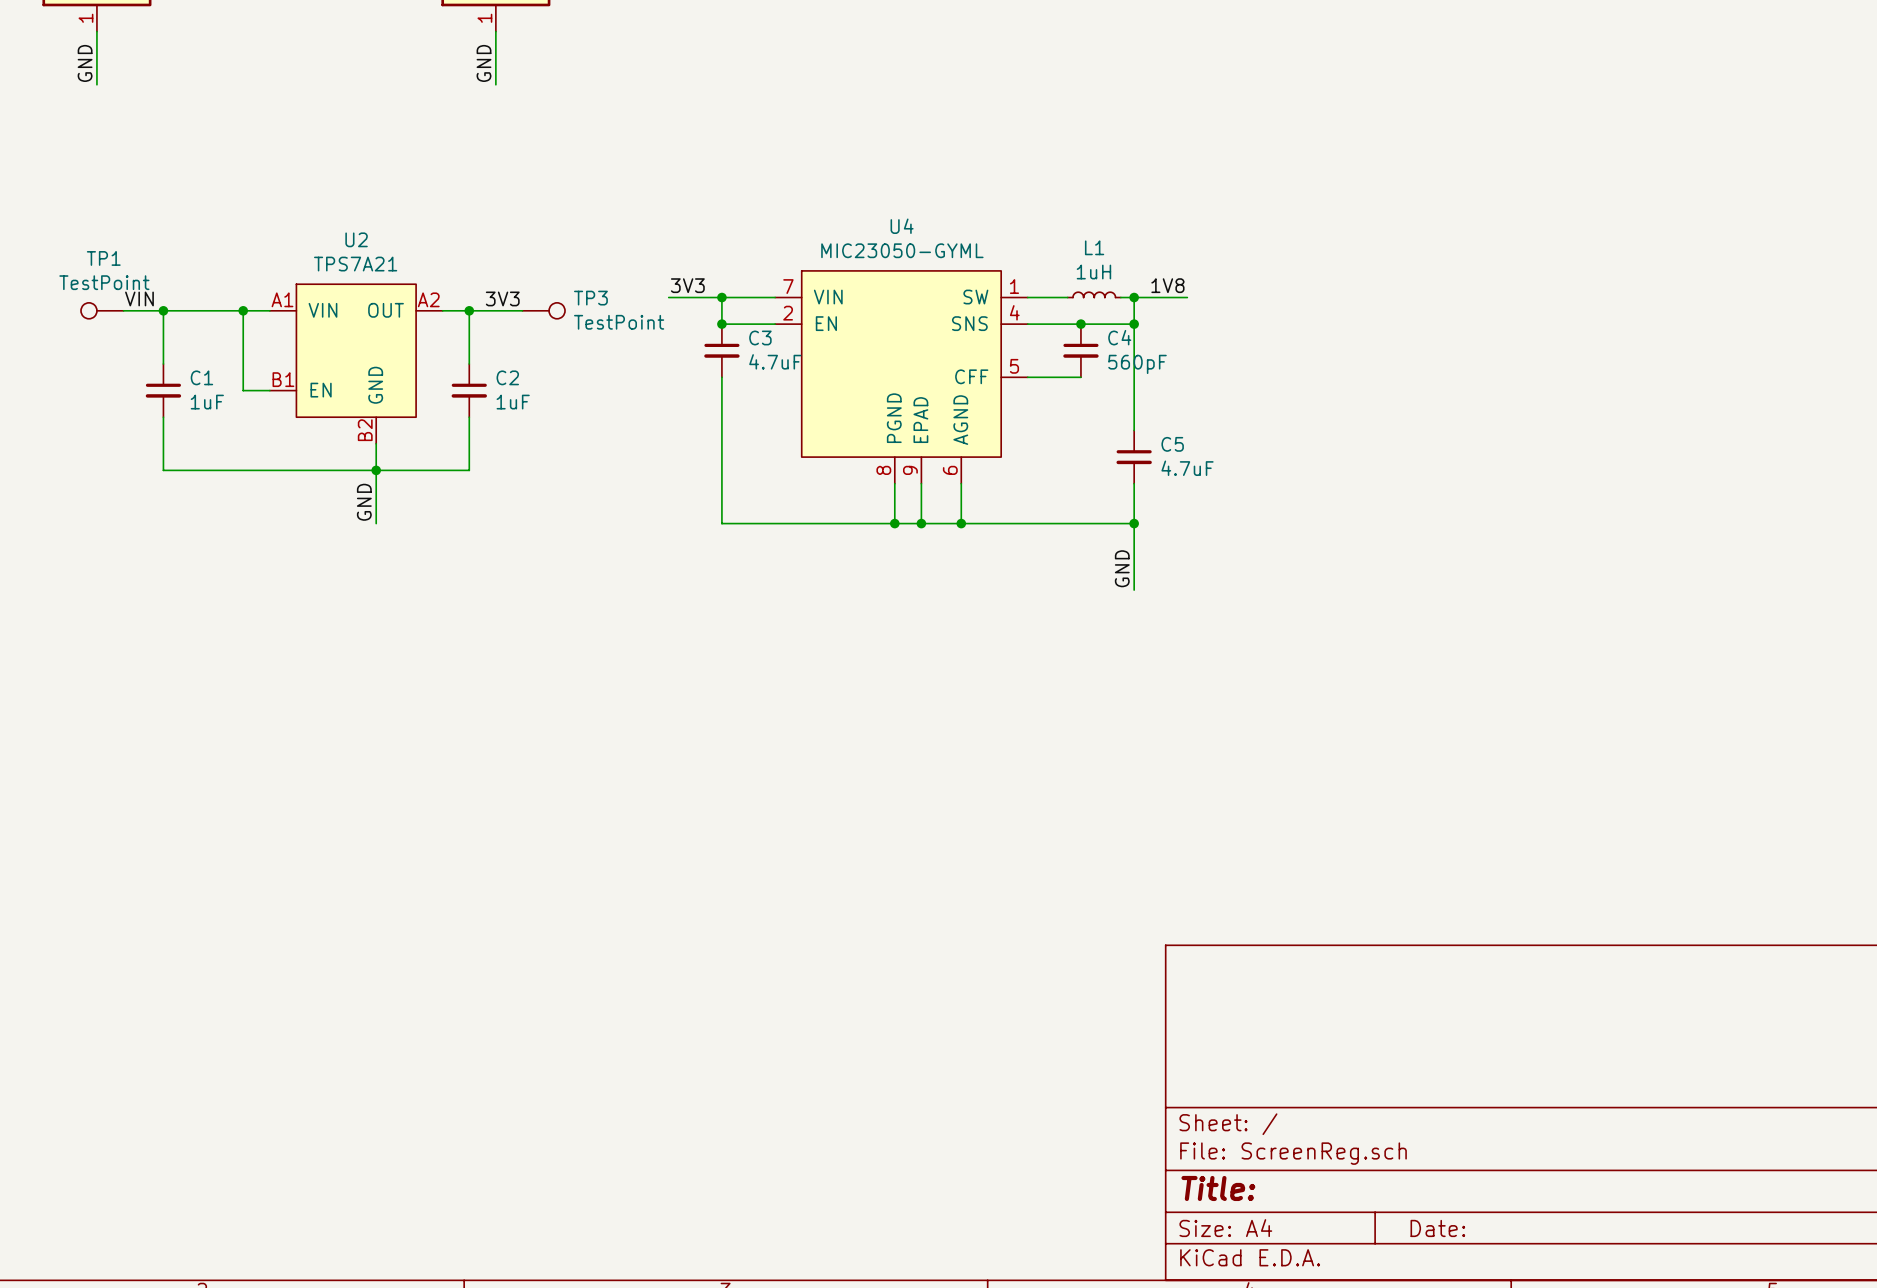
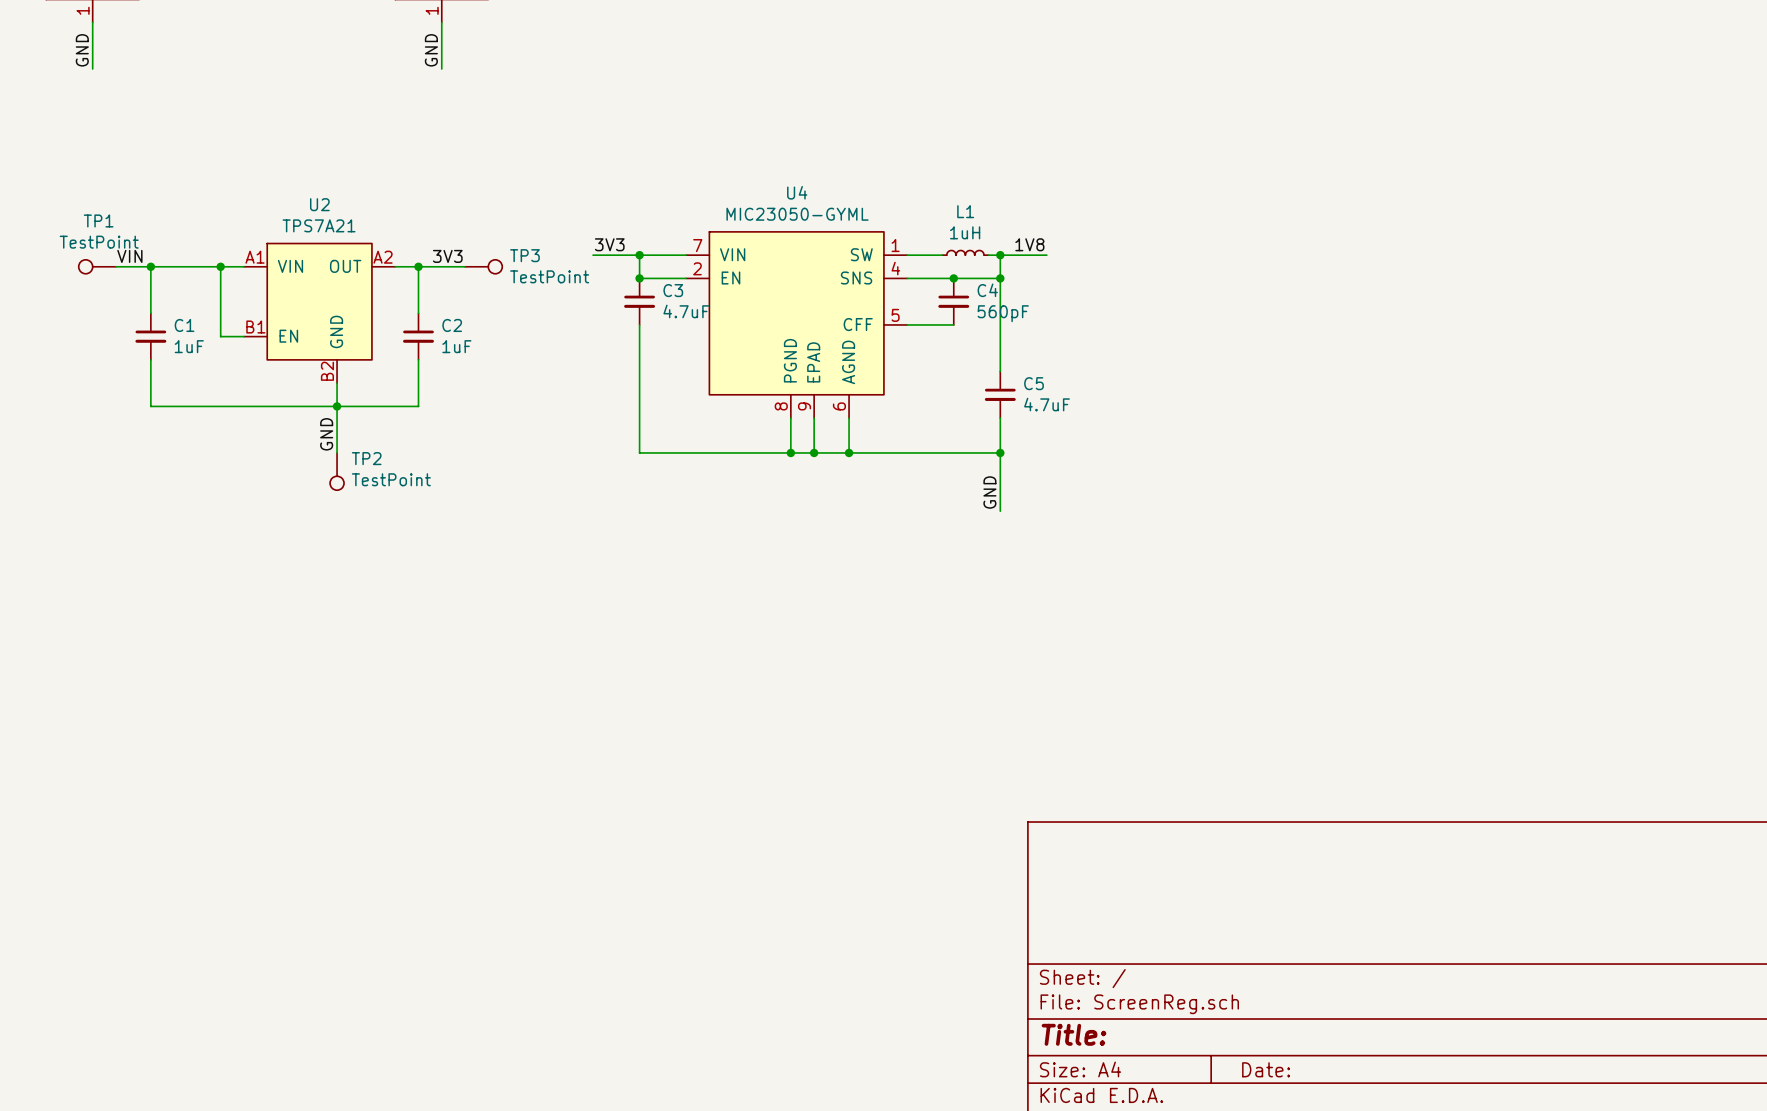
TP2: none -> TestPoint (337, 471)

